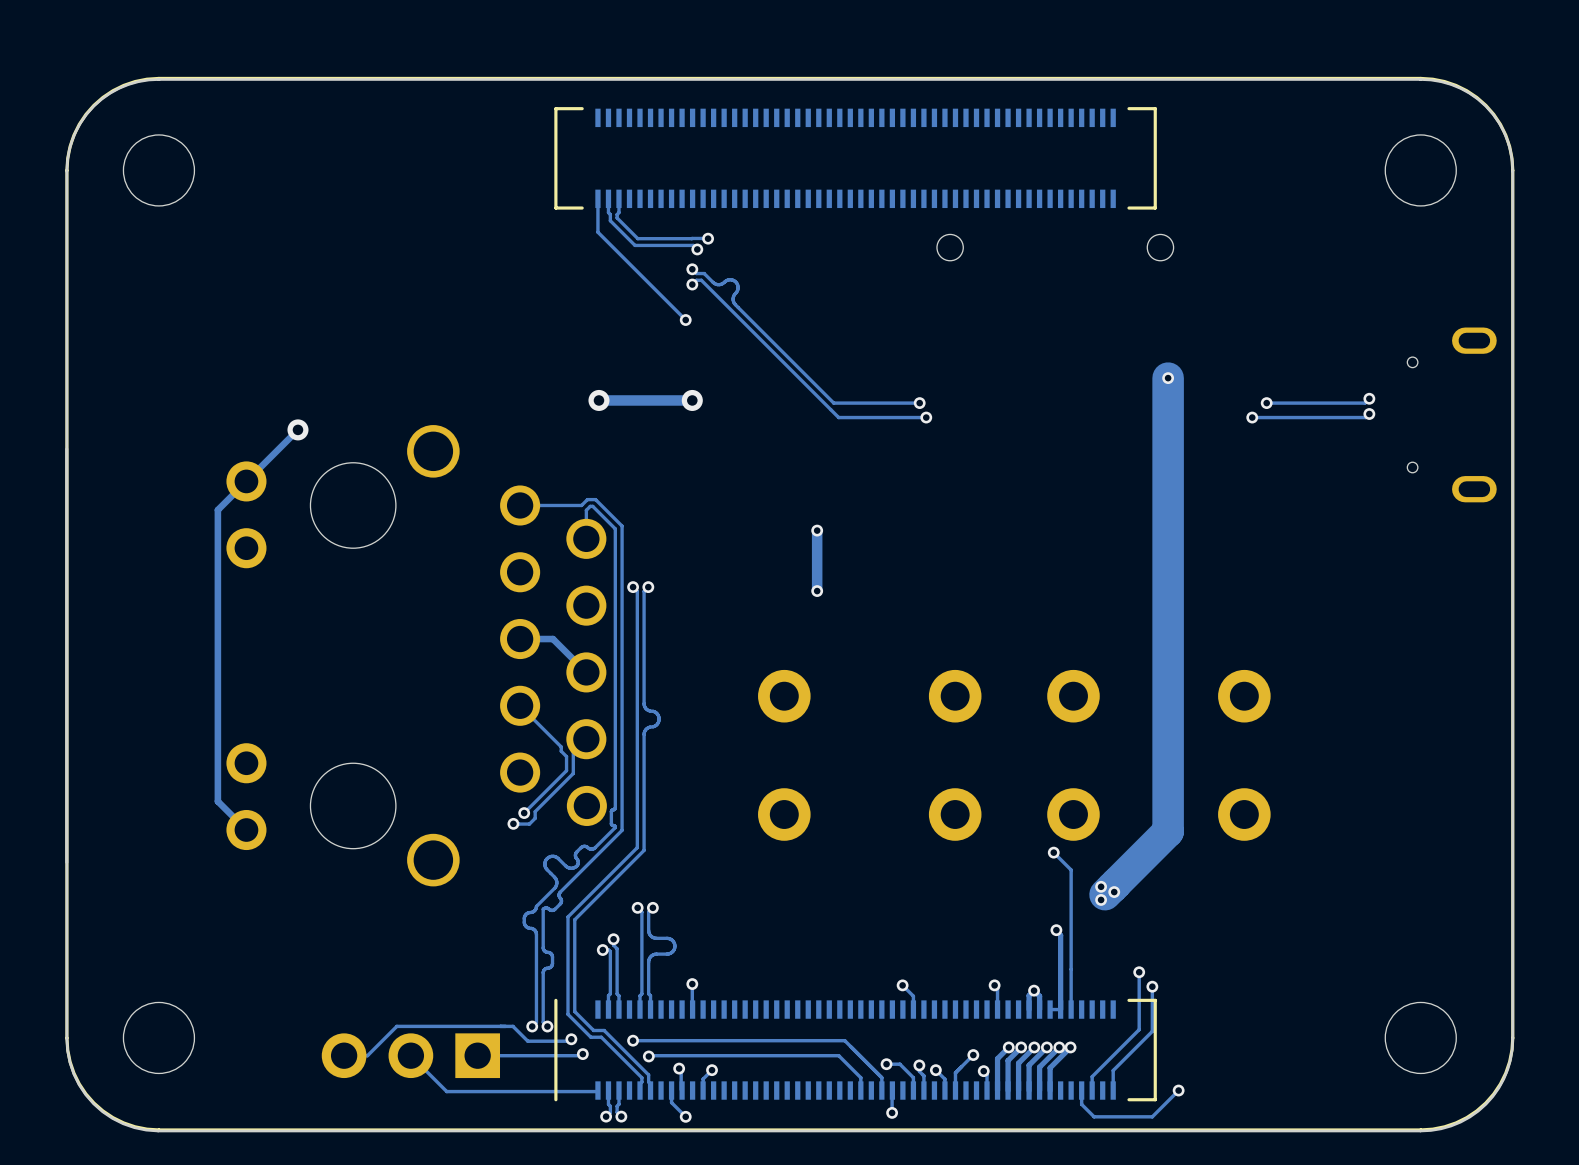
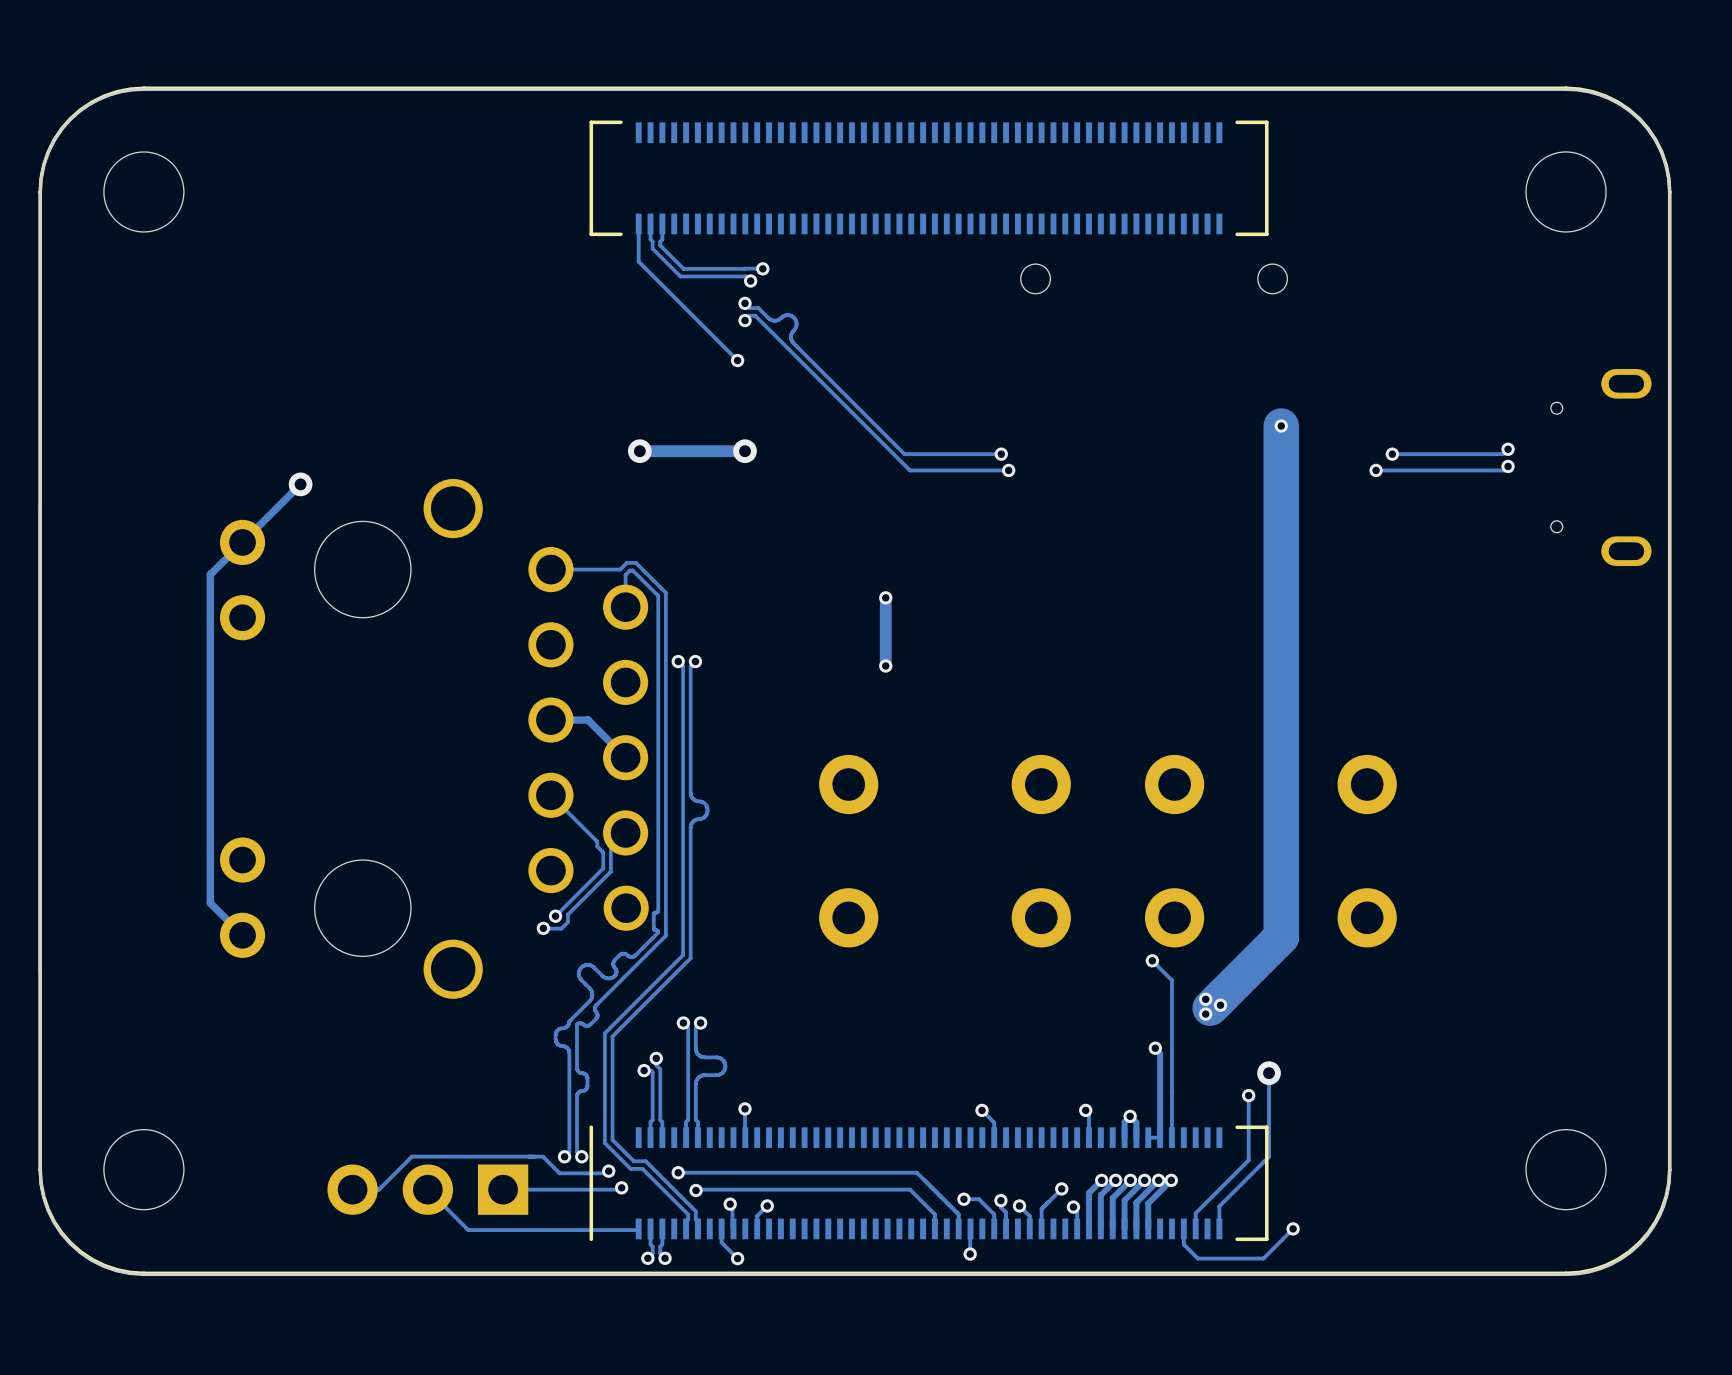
via: none -> (1269, 1073)
track: (1152, 986) (1152, 1031) -> (1269, 1073) (1269, 1156) (1263, 1162)
via: (1152, 986) -> none

